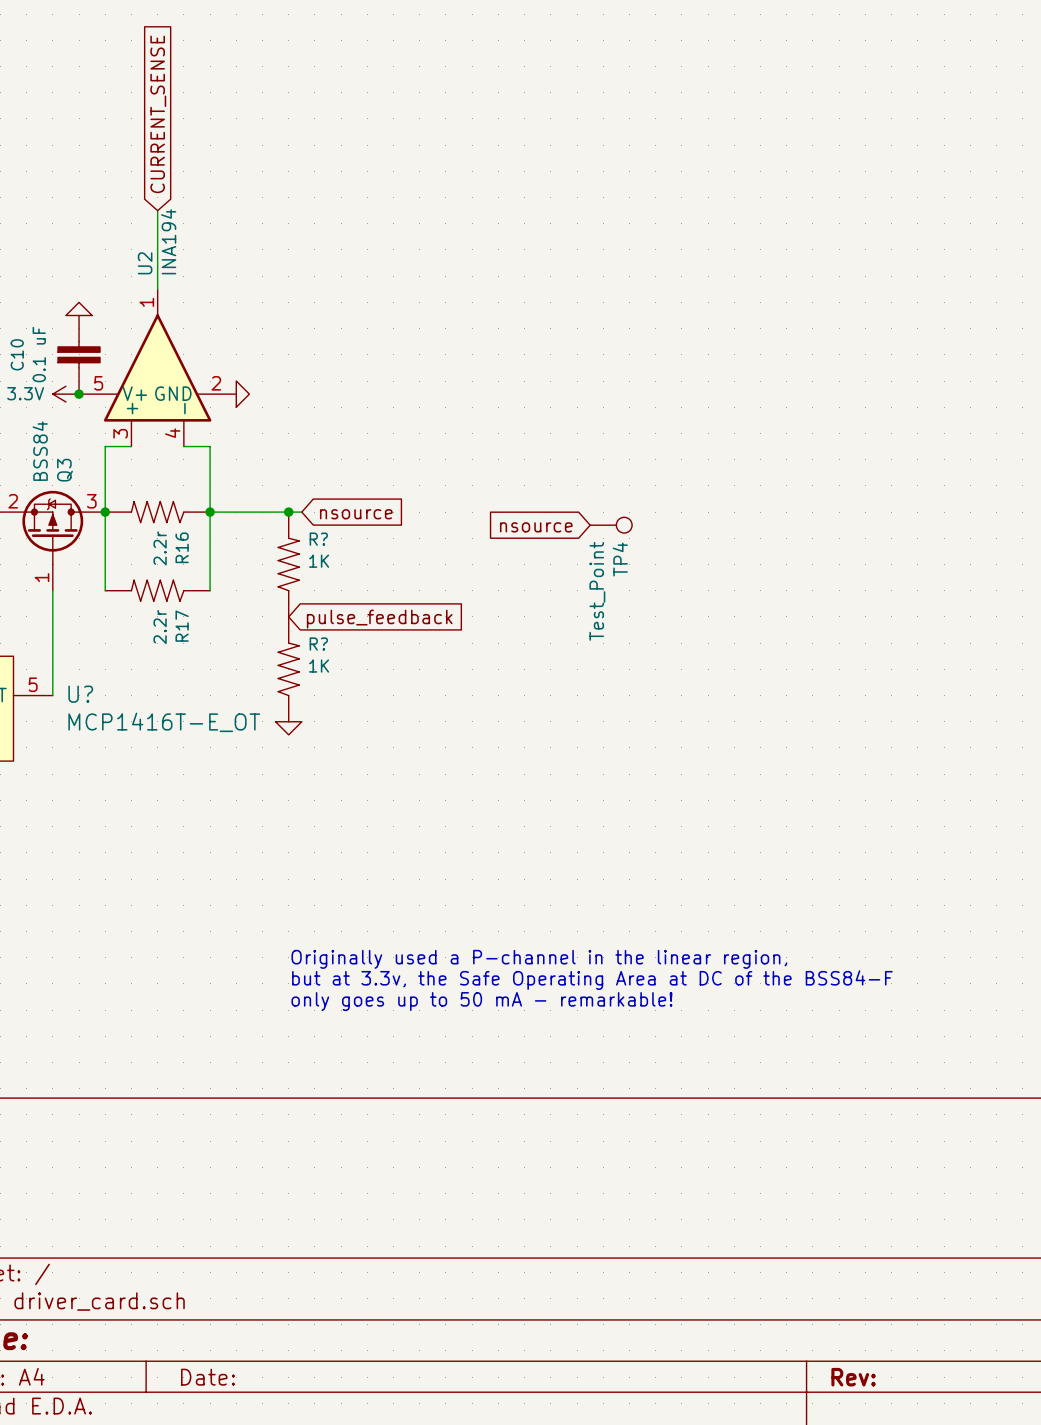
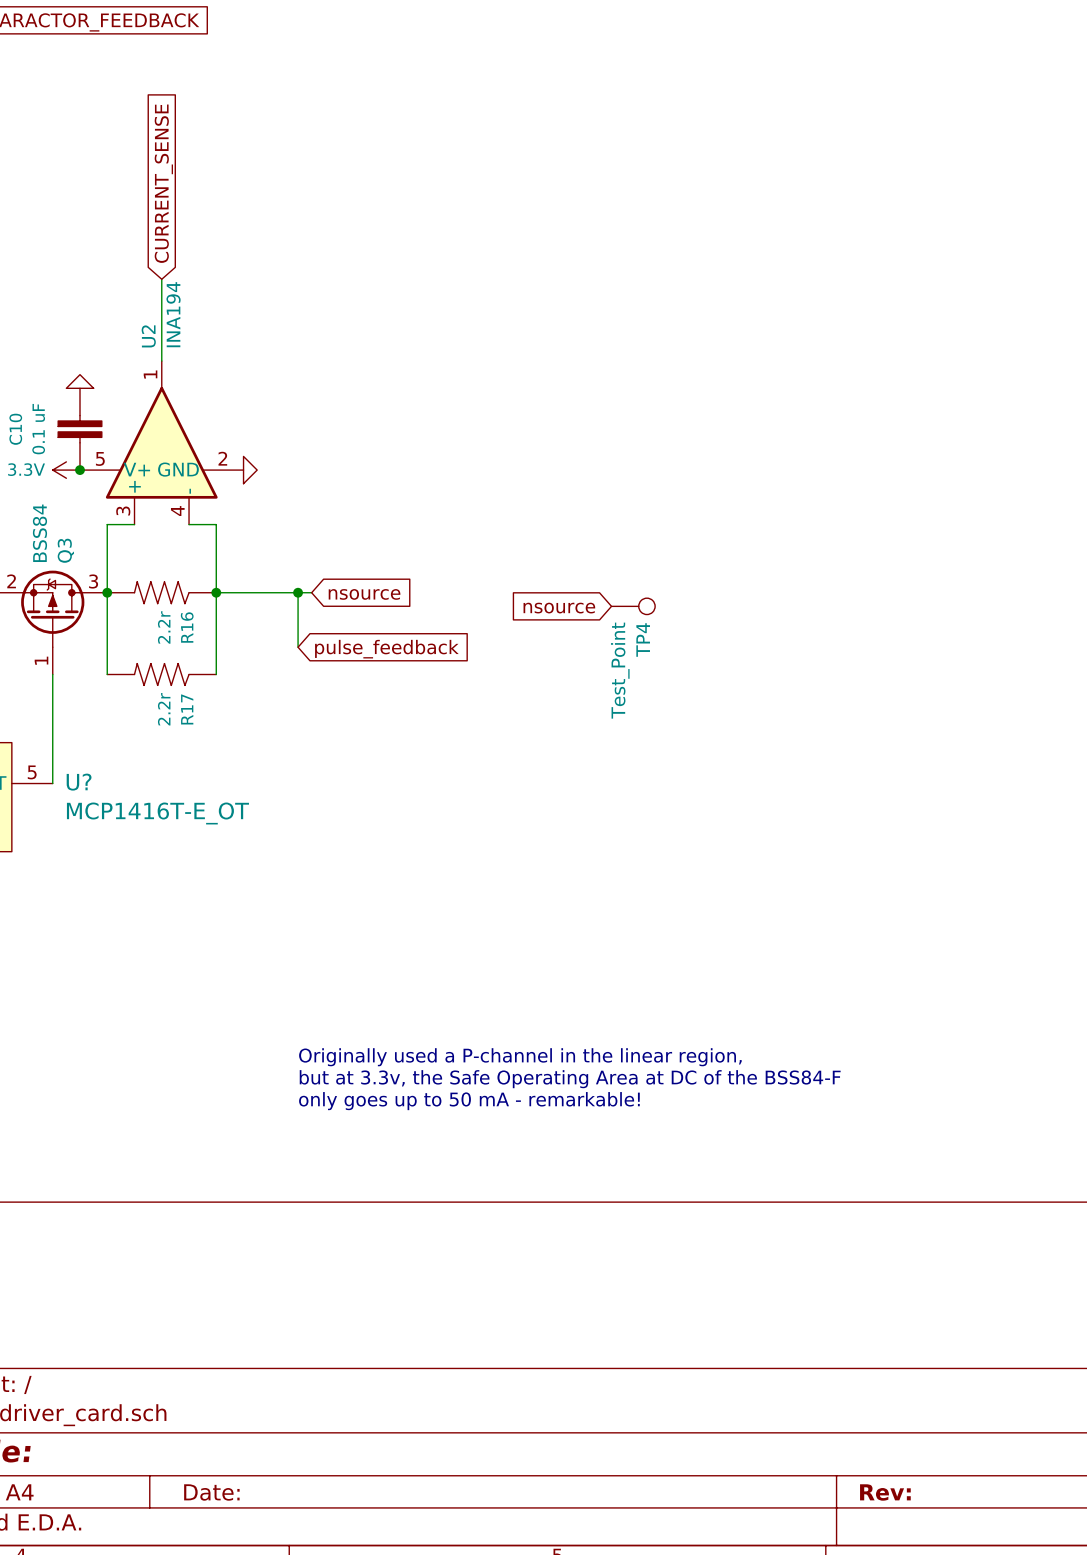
R?: 1K (288, 564) -> none
global label position: pulse_feedback (379, 619) -> pulse_feedback (386, 649)
R?: 1K (288, 669) -> none
power symbol: (288, 728) -> none

